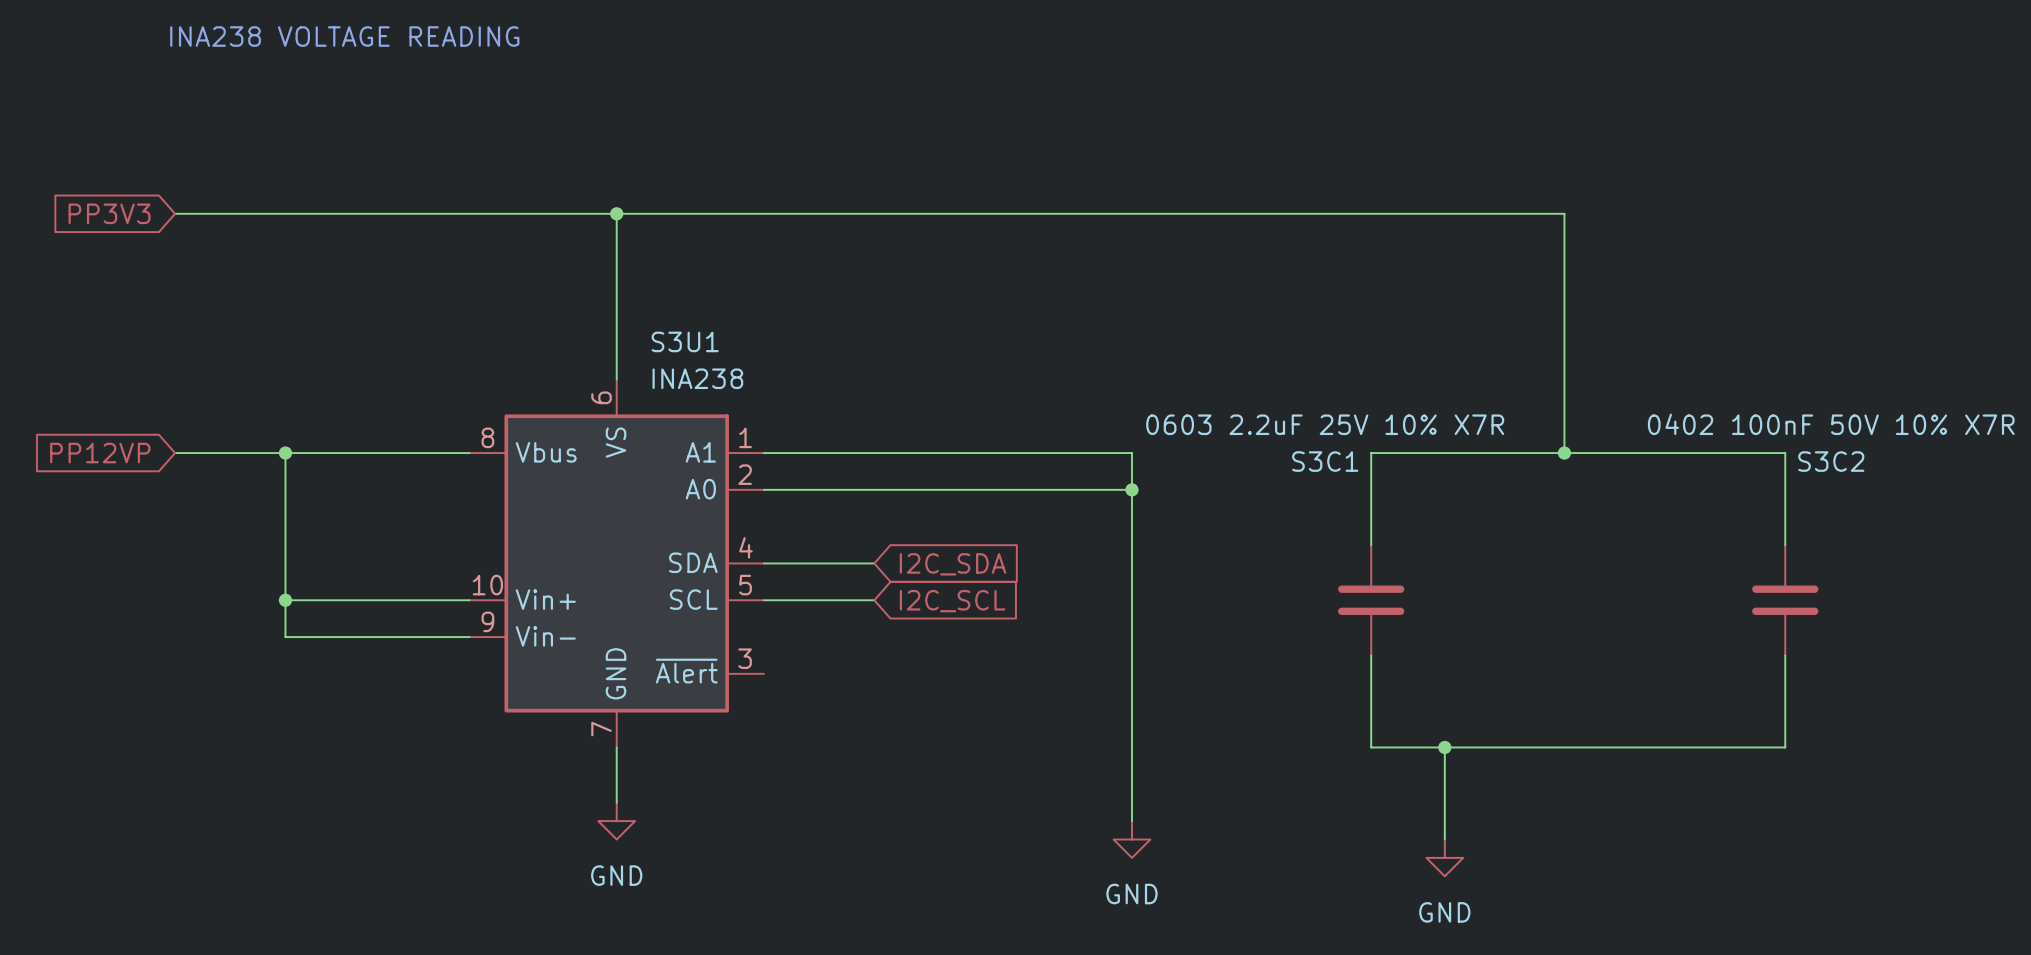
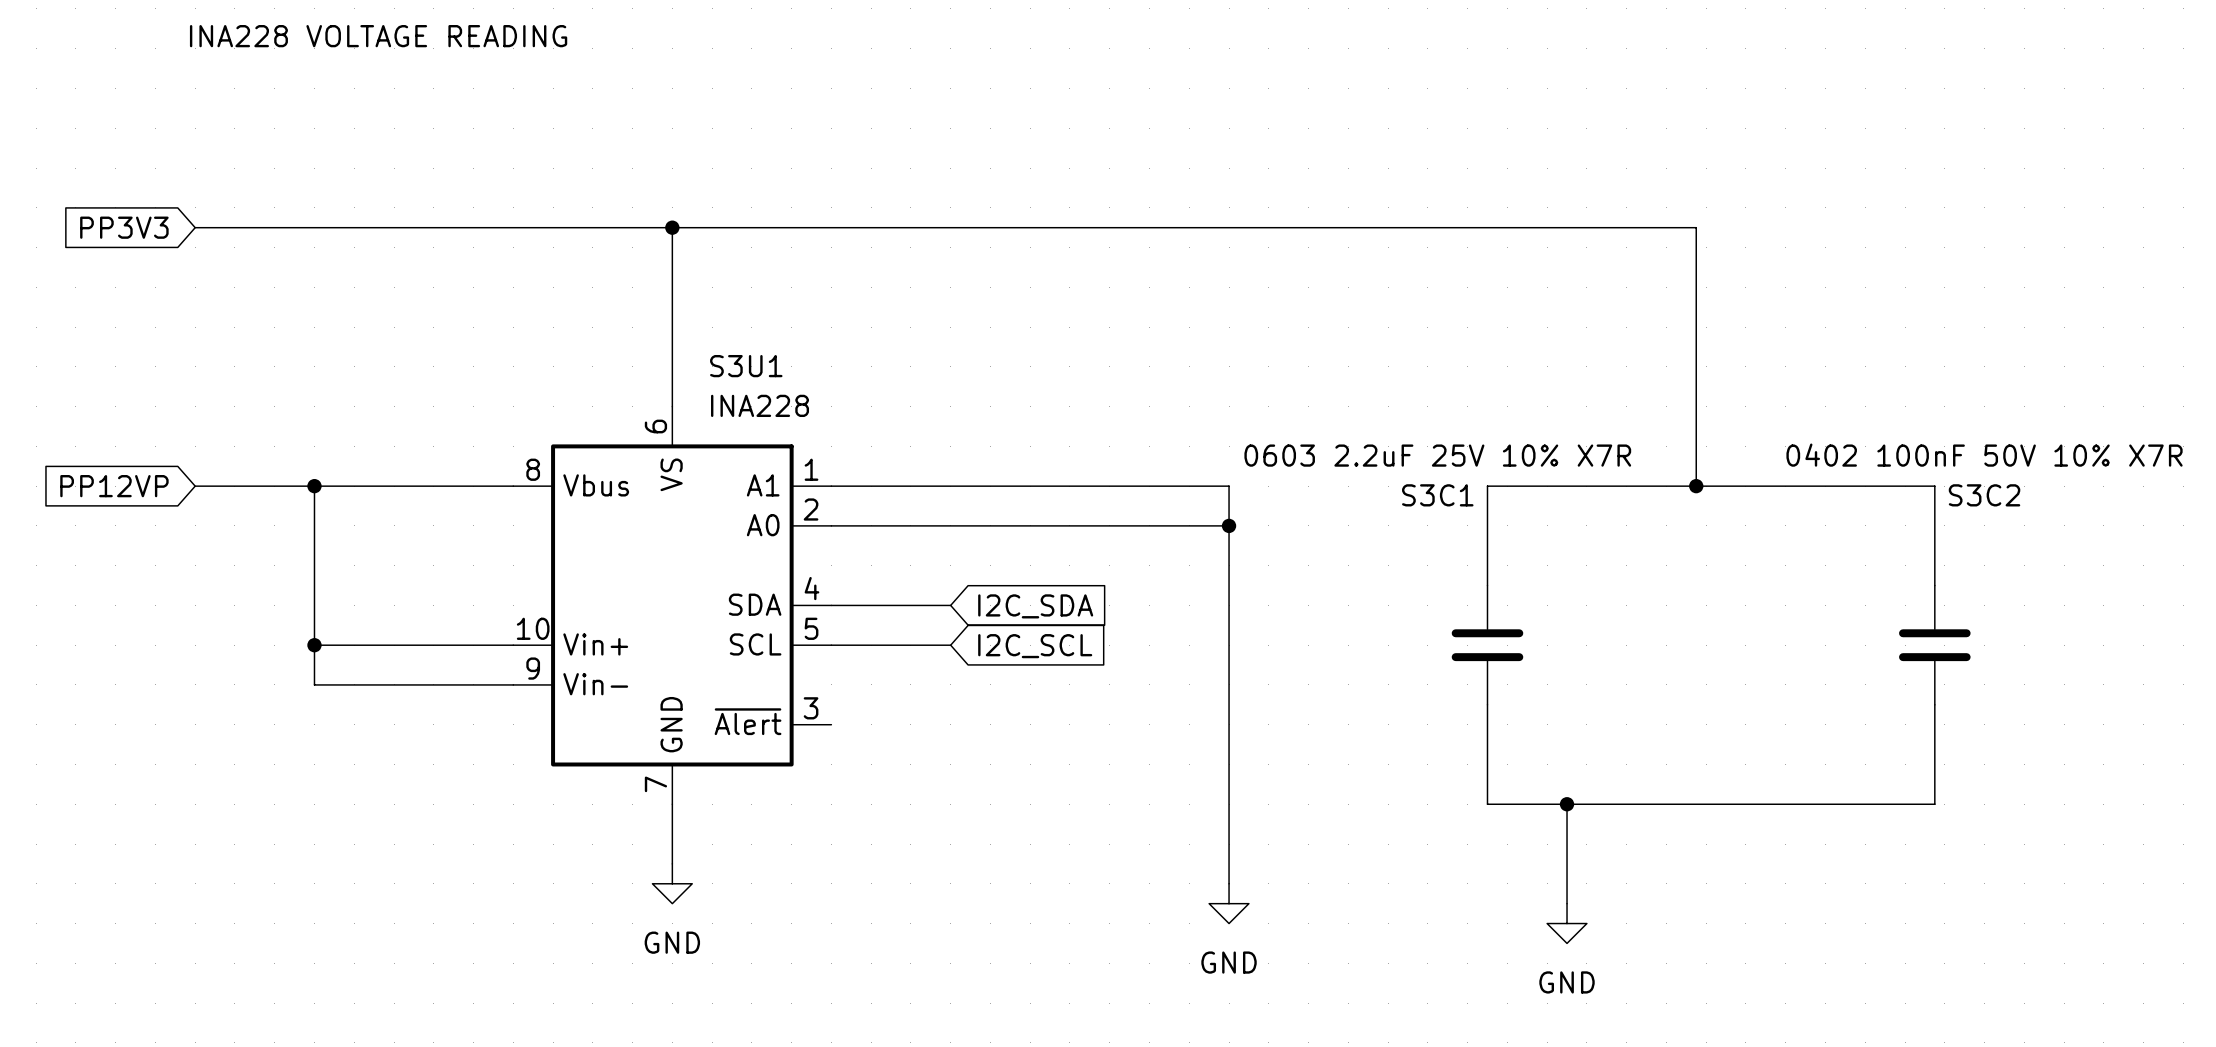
text: INA238 VOLTAGE READING (344, 36) -> INA228 VOLTAGE READING (378, 36)
S3U1 value: INA238 (697, 378) -> INA228 (760, 405)

